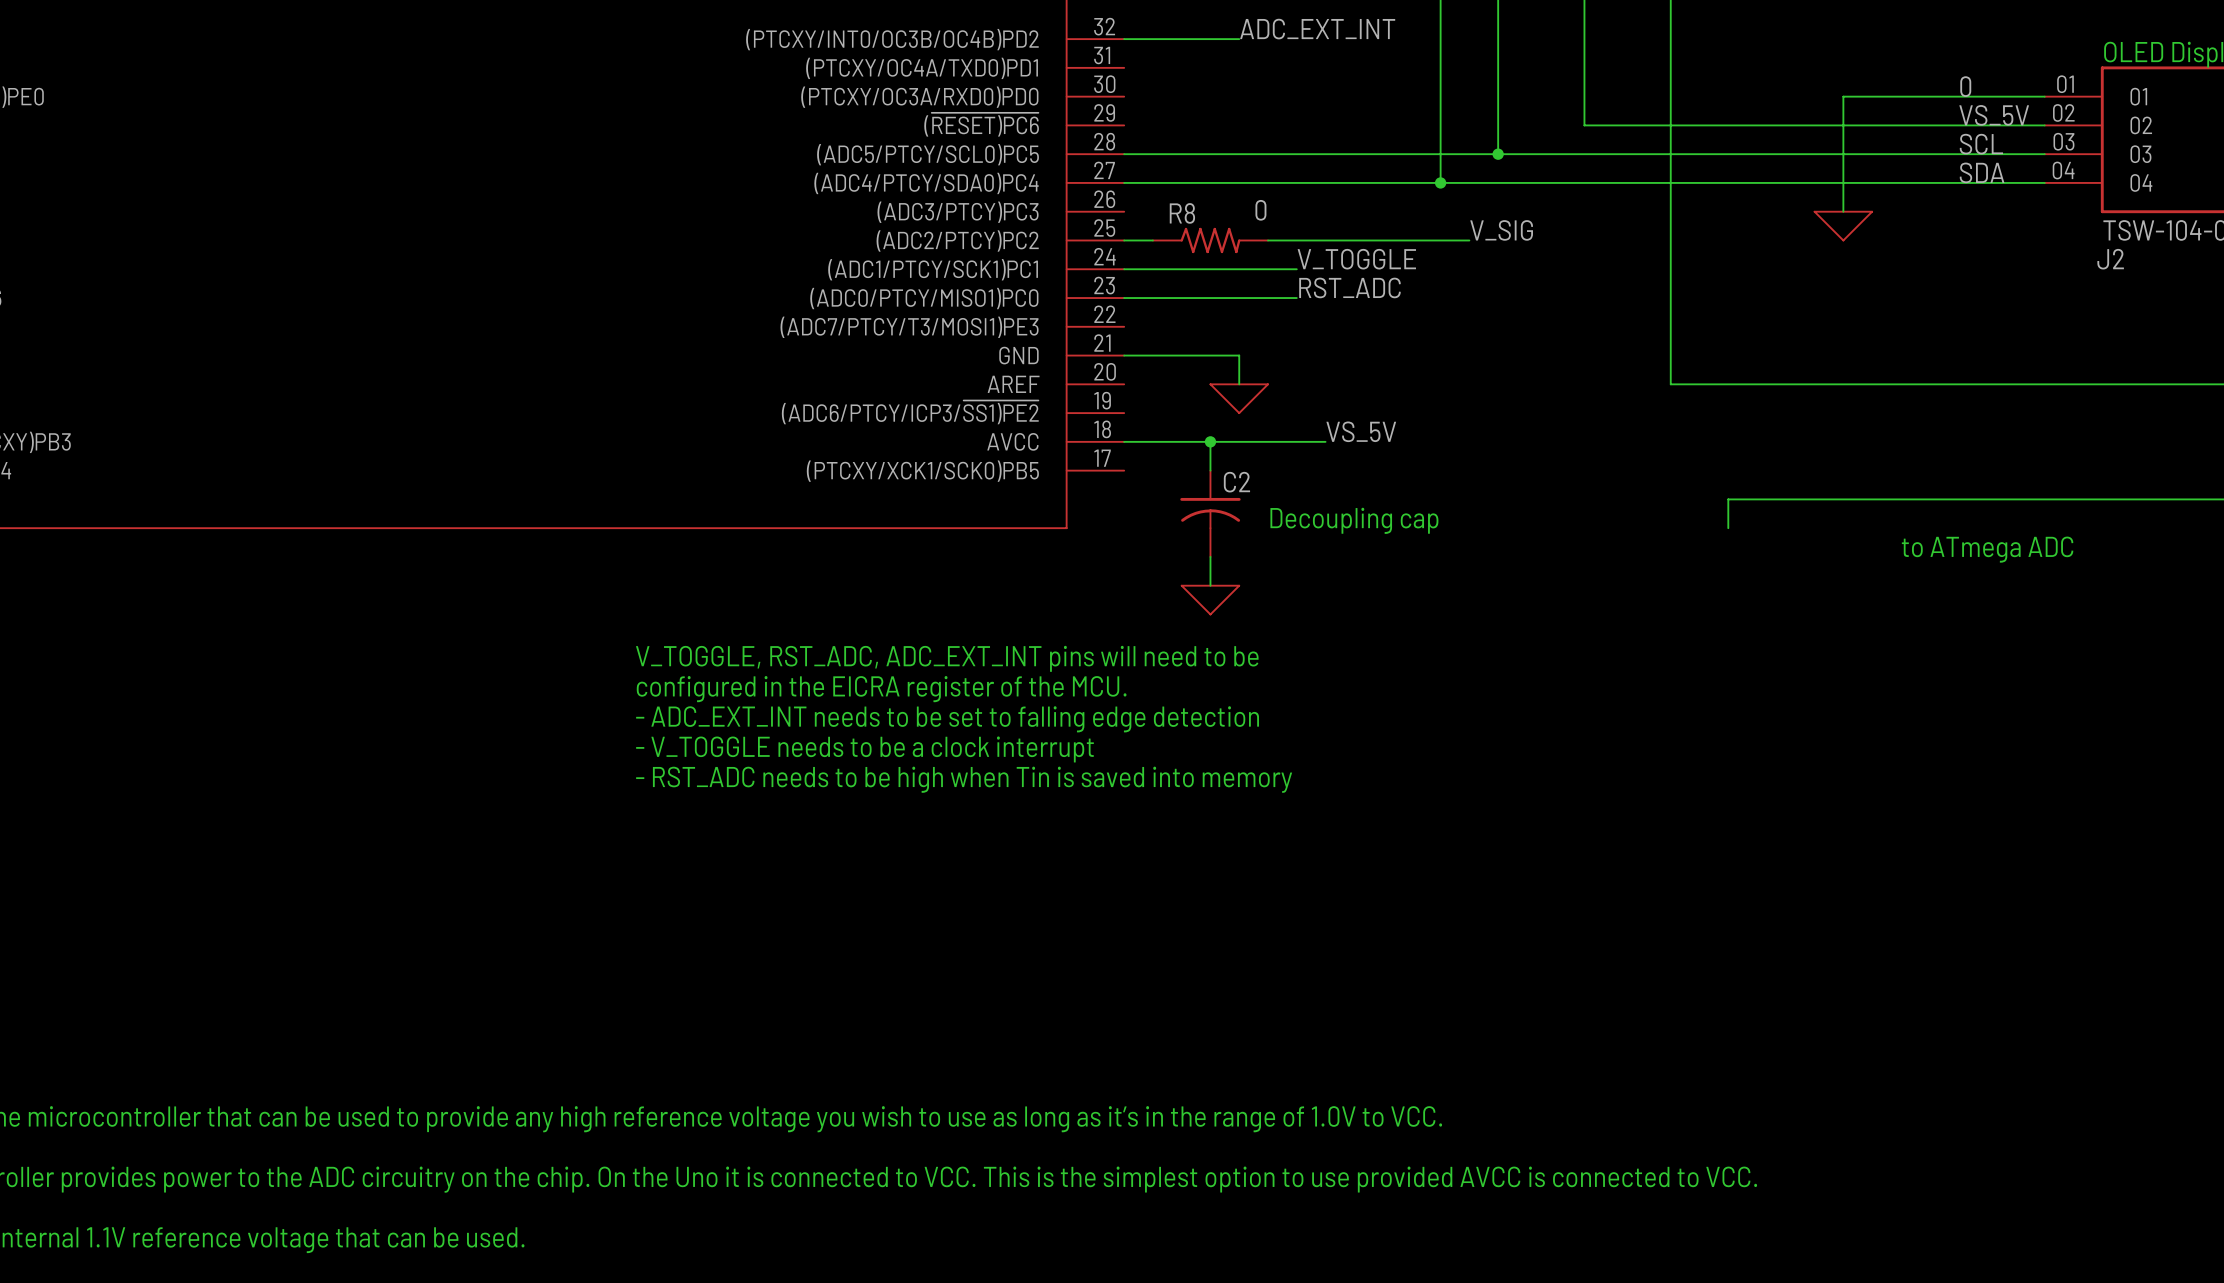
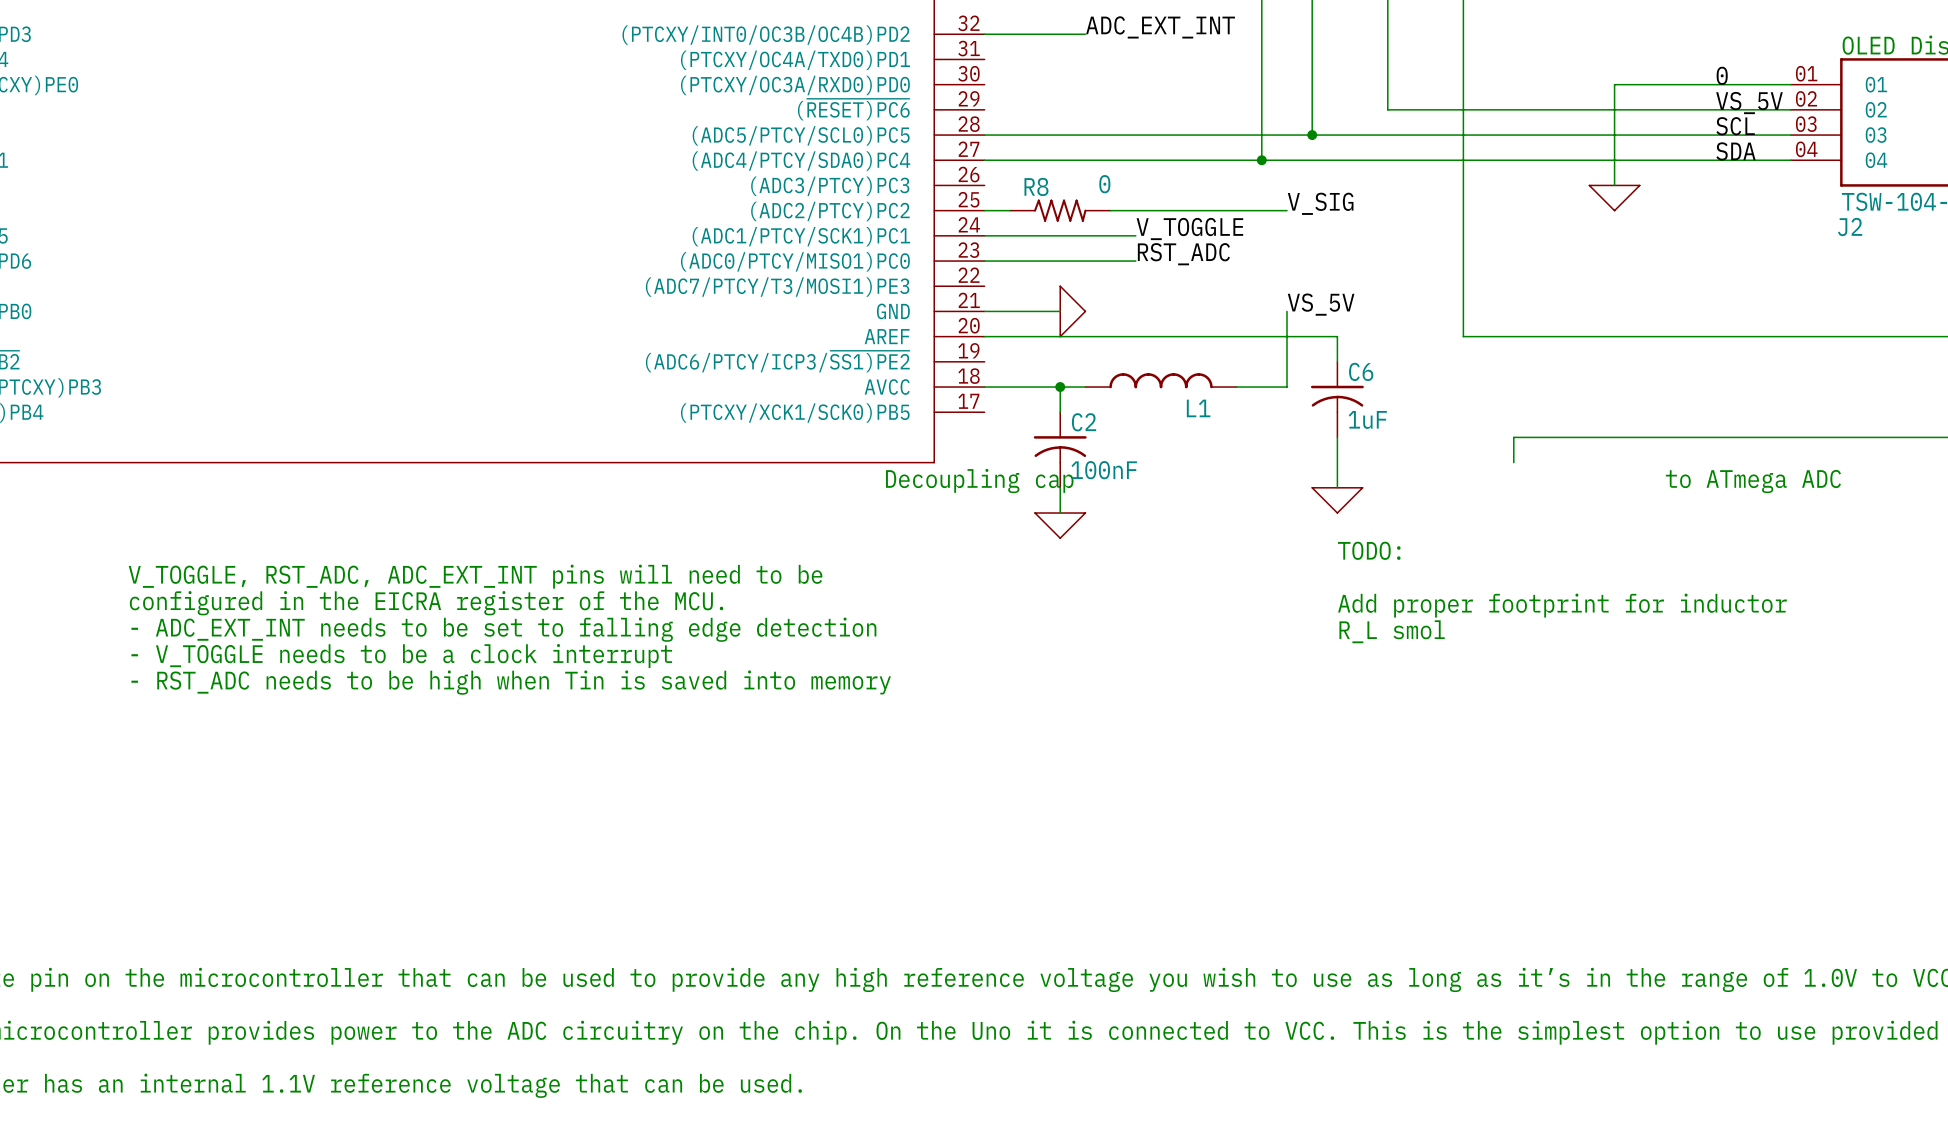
wire: (1210, 355) (1239, 355) (1239, 384) -> none
wire: none -> (1287, 311) (1287, 387) (1236, 387)
wire: none -> (984, 336) (1337, 336) (1337, 361)
power symbol rotation: 0° (1239, 398) -> 90° counterclockwise (1072, 311)
power symbol position: (1239, 398) -> (1072, 311)
label position: VS_5V (1361, 431) -> VS_5V (1321, 304)
L1: none -> (1161, 380)
wire: (1239, 441) (1325, 441) -> none
C6: none -> 1uF (1337, 399)
wire: none -> (1337, 437) (1337, 487)
text position: Decoupling cap (1354, 520) -> Decoupling cap (979, 481)
C2 value: none -> 100nF (1104, 470)
power symbol: none -> (1337, 500)
text: none -> TODO: (1369, 550)
text: none -> V_TOGGLE, RST_ADC, ADC_EXT_INT pins will need to be (475, 576)
text: V_TOGGLE, RST_ADC, ADC_EXT_INT pins will need to be (947, 658) -> none
text: none -> configured in the EICRA register of the MCU. (426, 603)
text: configured in the EICRA register of the MCU. (881, 689) -> none
text: none -> Add proper footprint for inductor (1562, 605)
text: none -> - ADC_EXT_INT needs to be set to falling edge detection (503, 629)
text: - ADC_EXT_INT needs to be set to falling edge detection (947, 719) -> none
text: none -> R_L smol (1392, 631)
text: none -> - V_TOGGLE needs to be a clock interrupt (401, 656)
text: - V_TOGGLE needs to be a clock interrupt (864, 749) -> none
text: none -> - RST_ADC needs to be high when Tin is saved into memory (511, 682)
text: - RST_ADC needs to be high when Tin is saved into memory (964, 779) -> none

